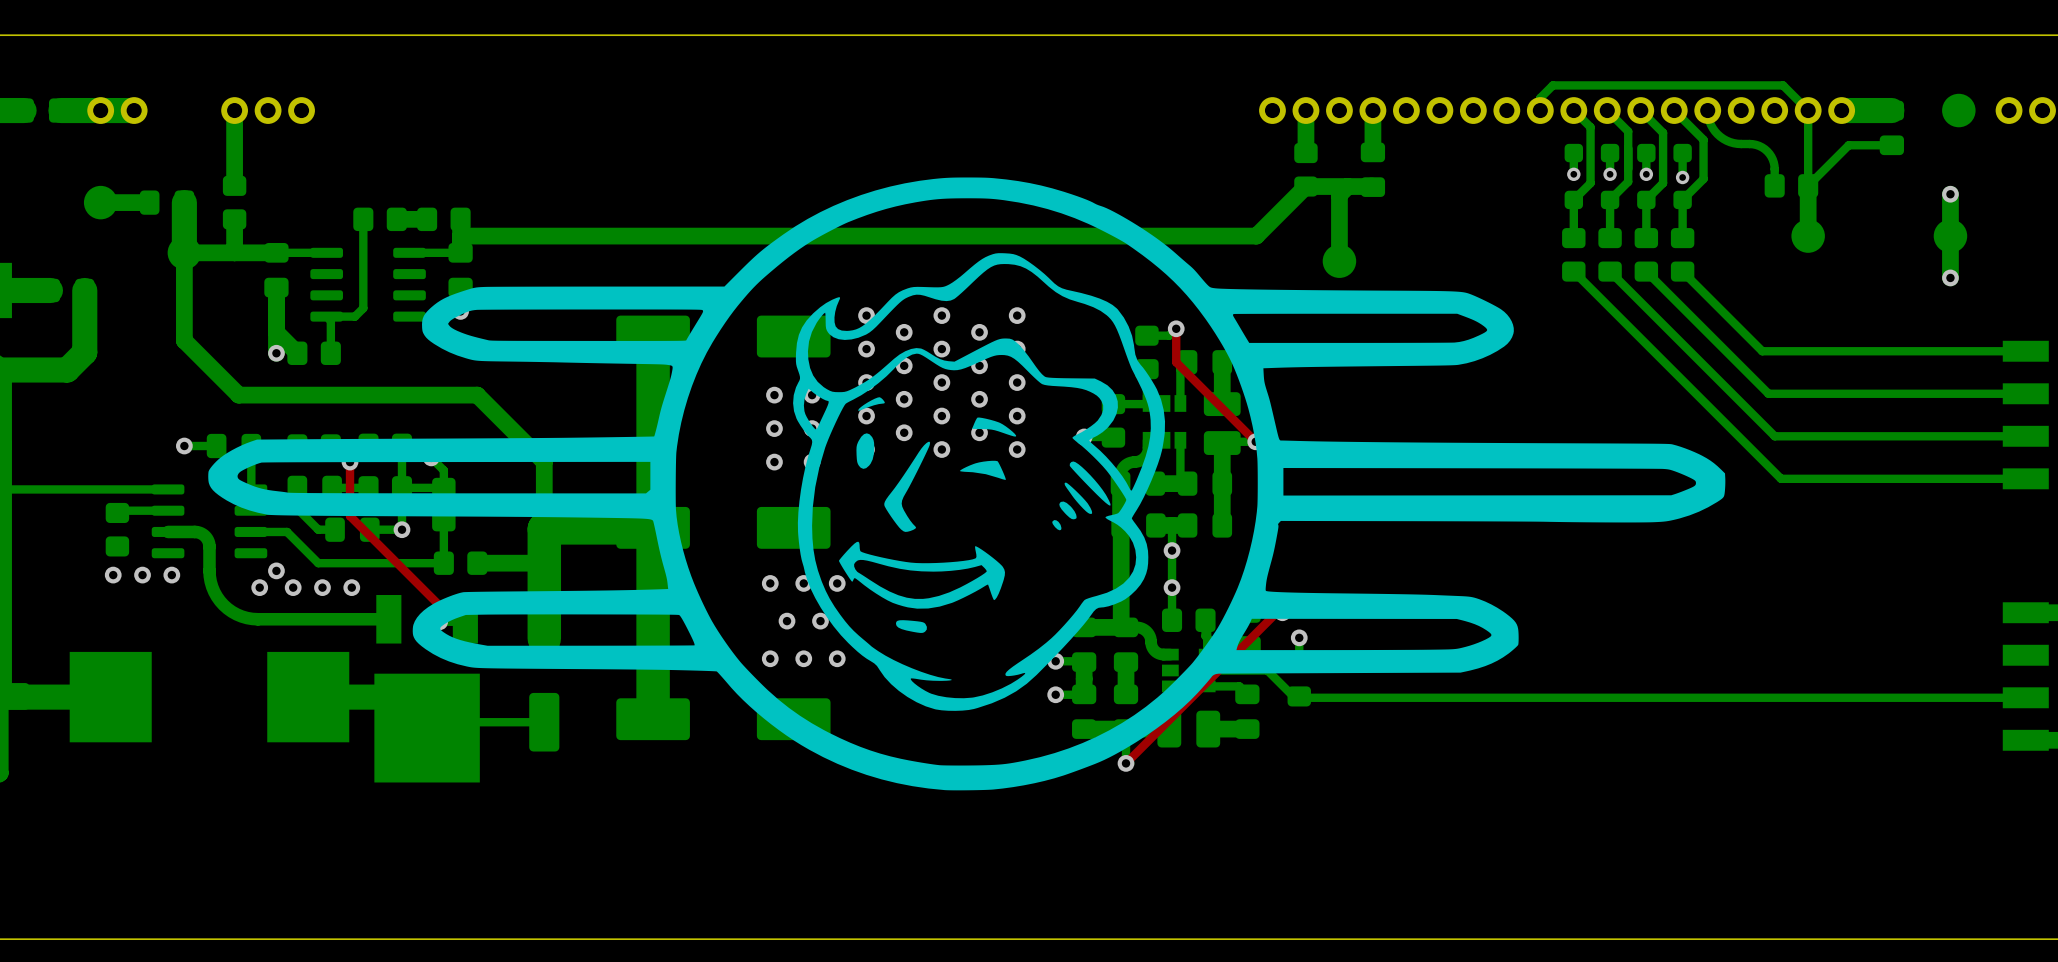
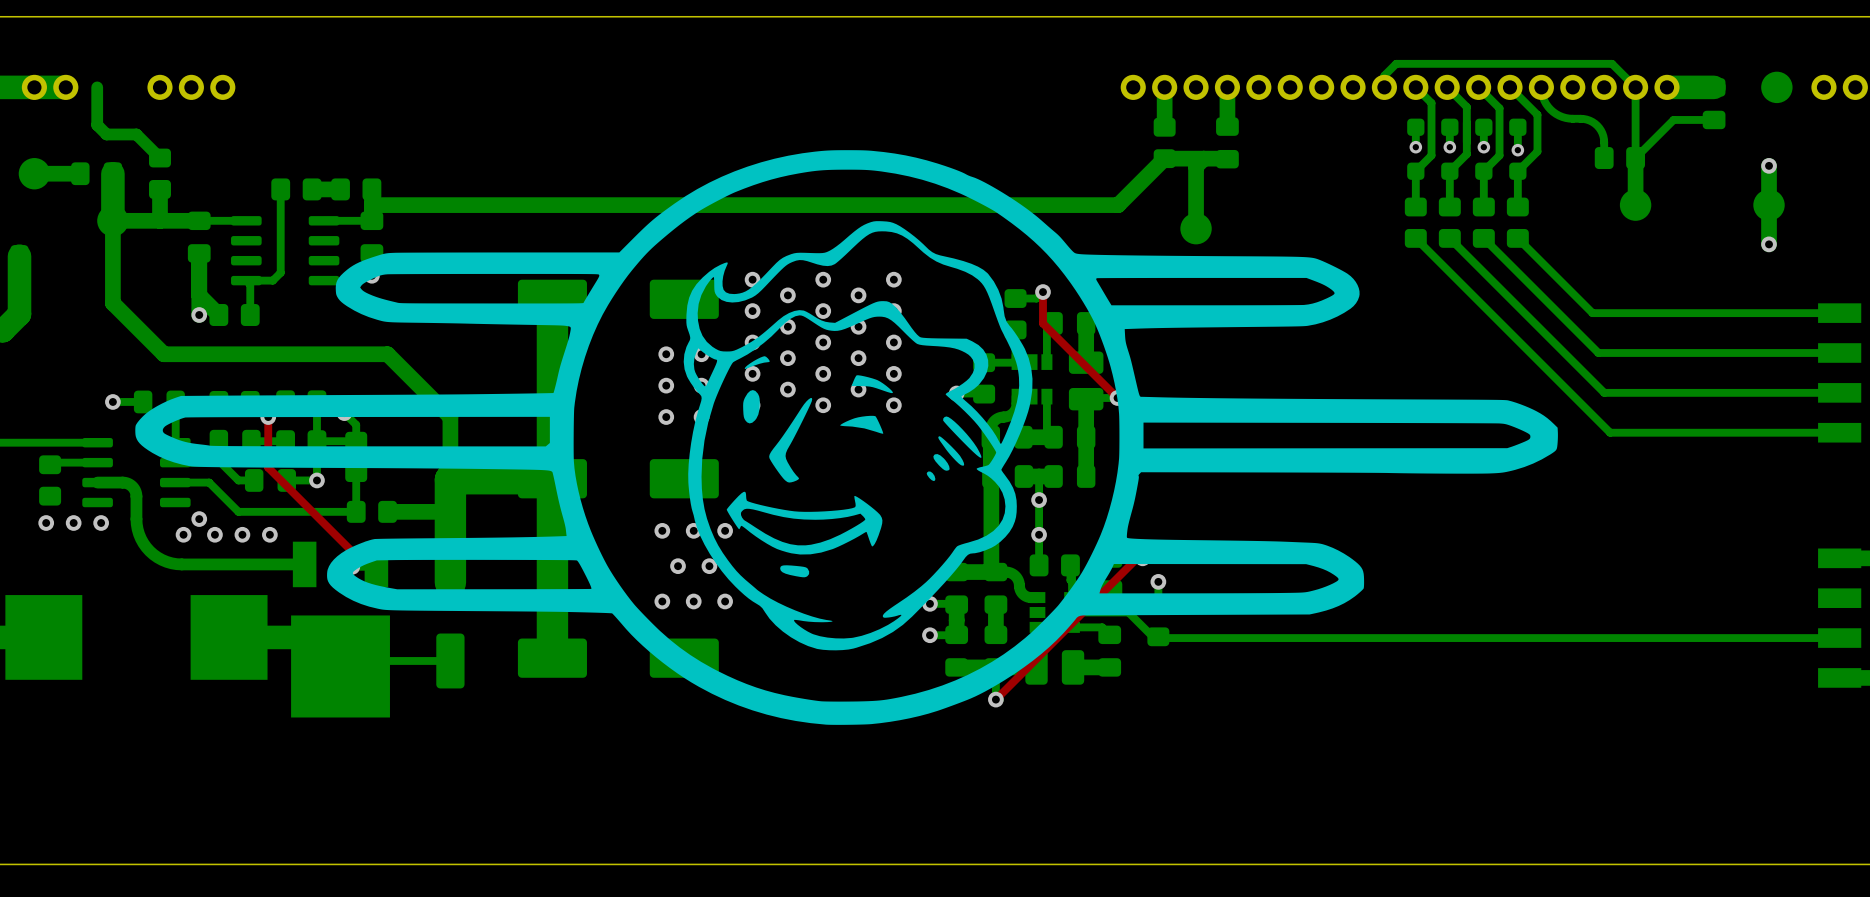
bottom track: (234, 110) (234, 185) -> (97, 87) (97, 125) (106, 134) (136, 134) (160, 158)

